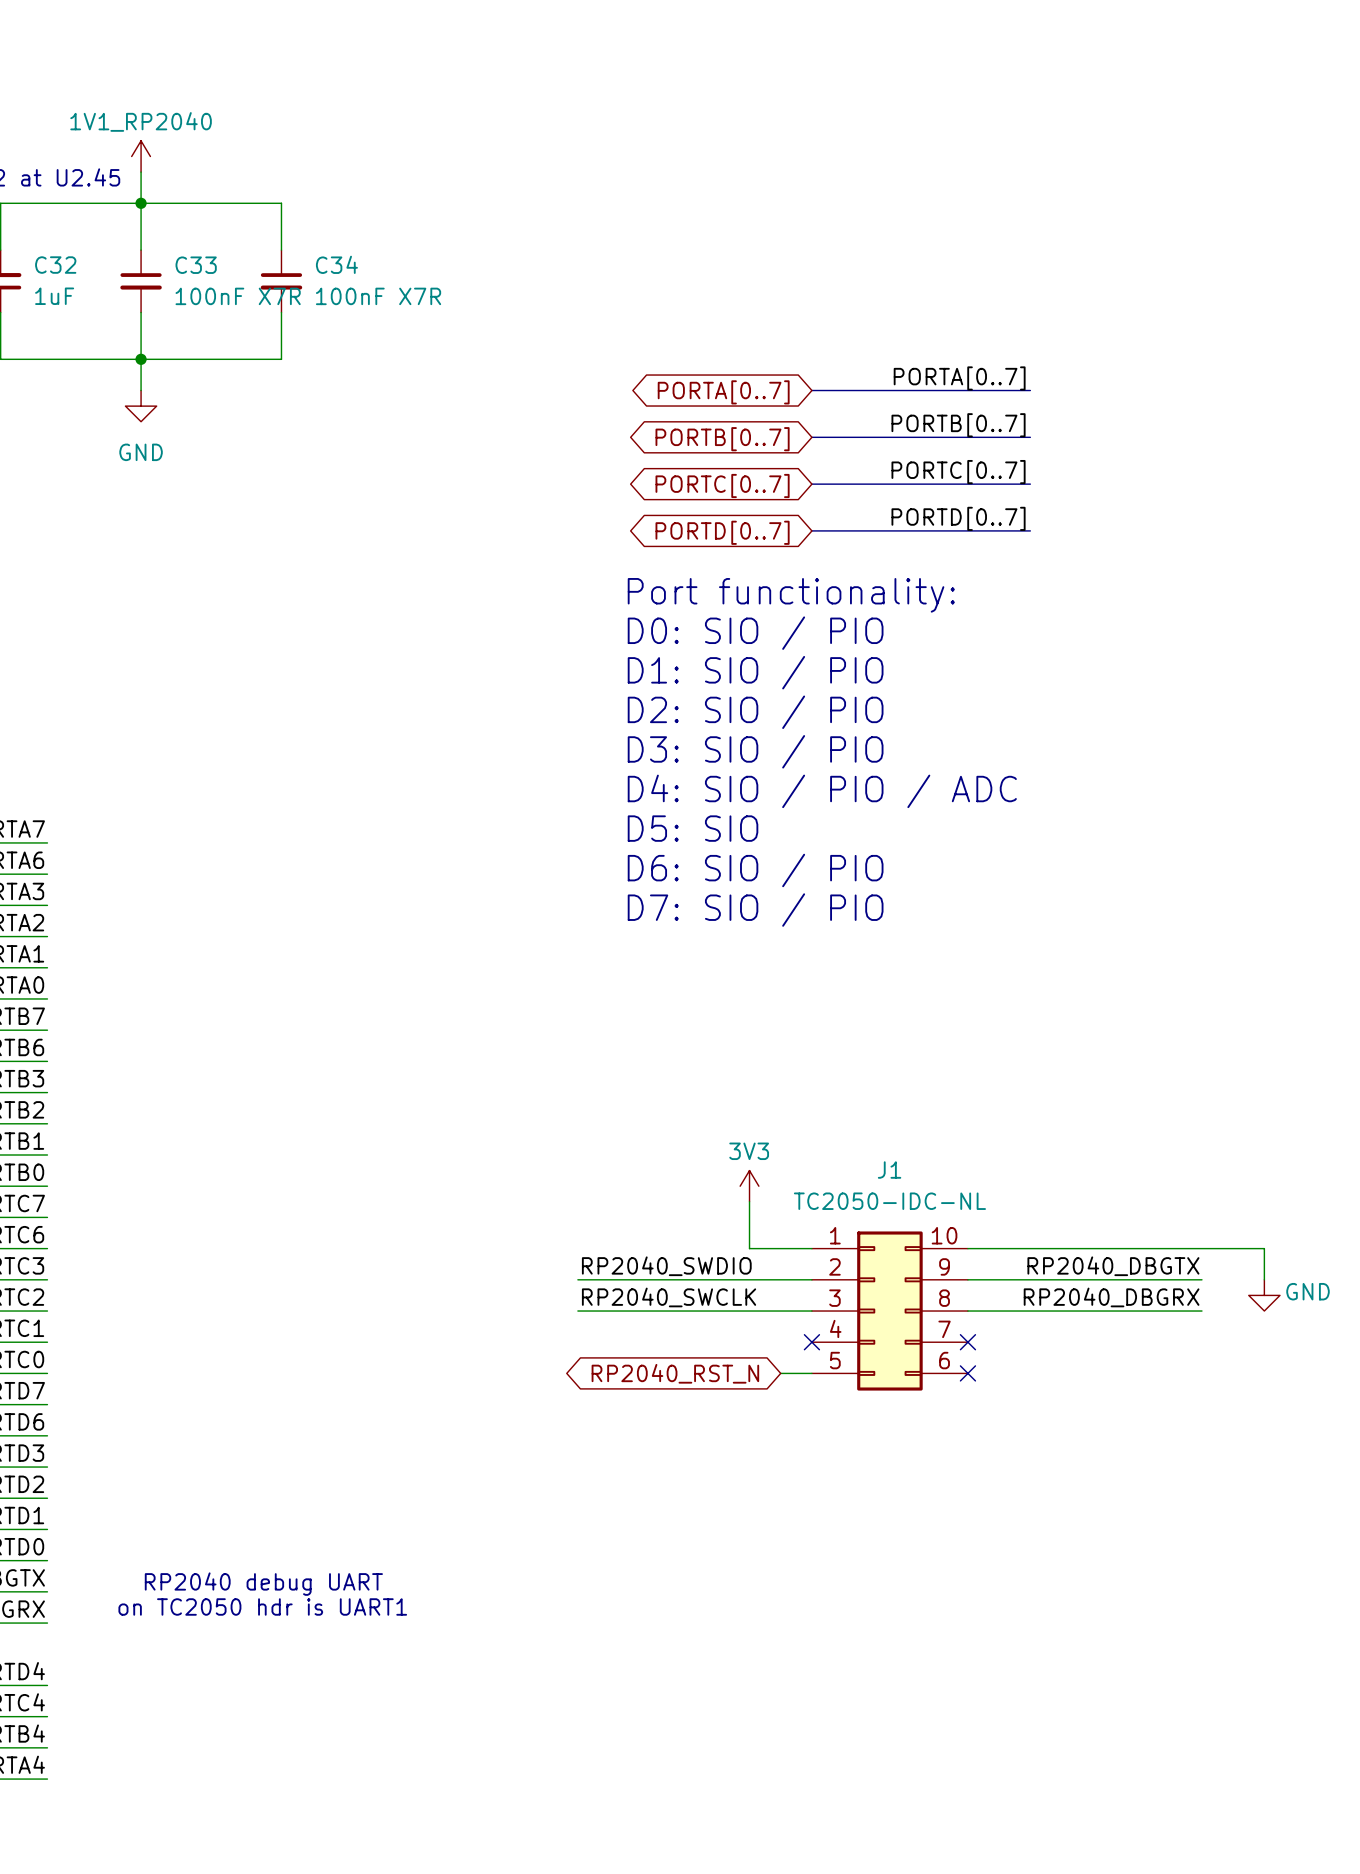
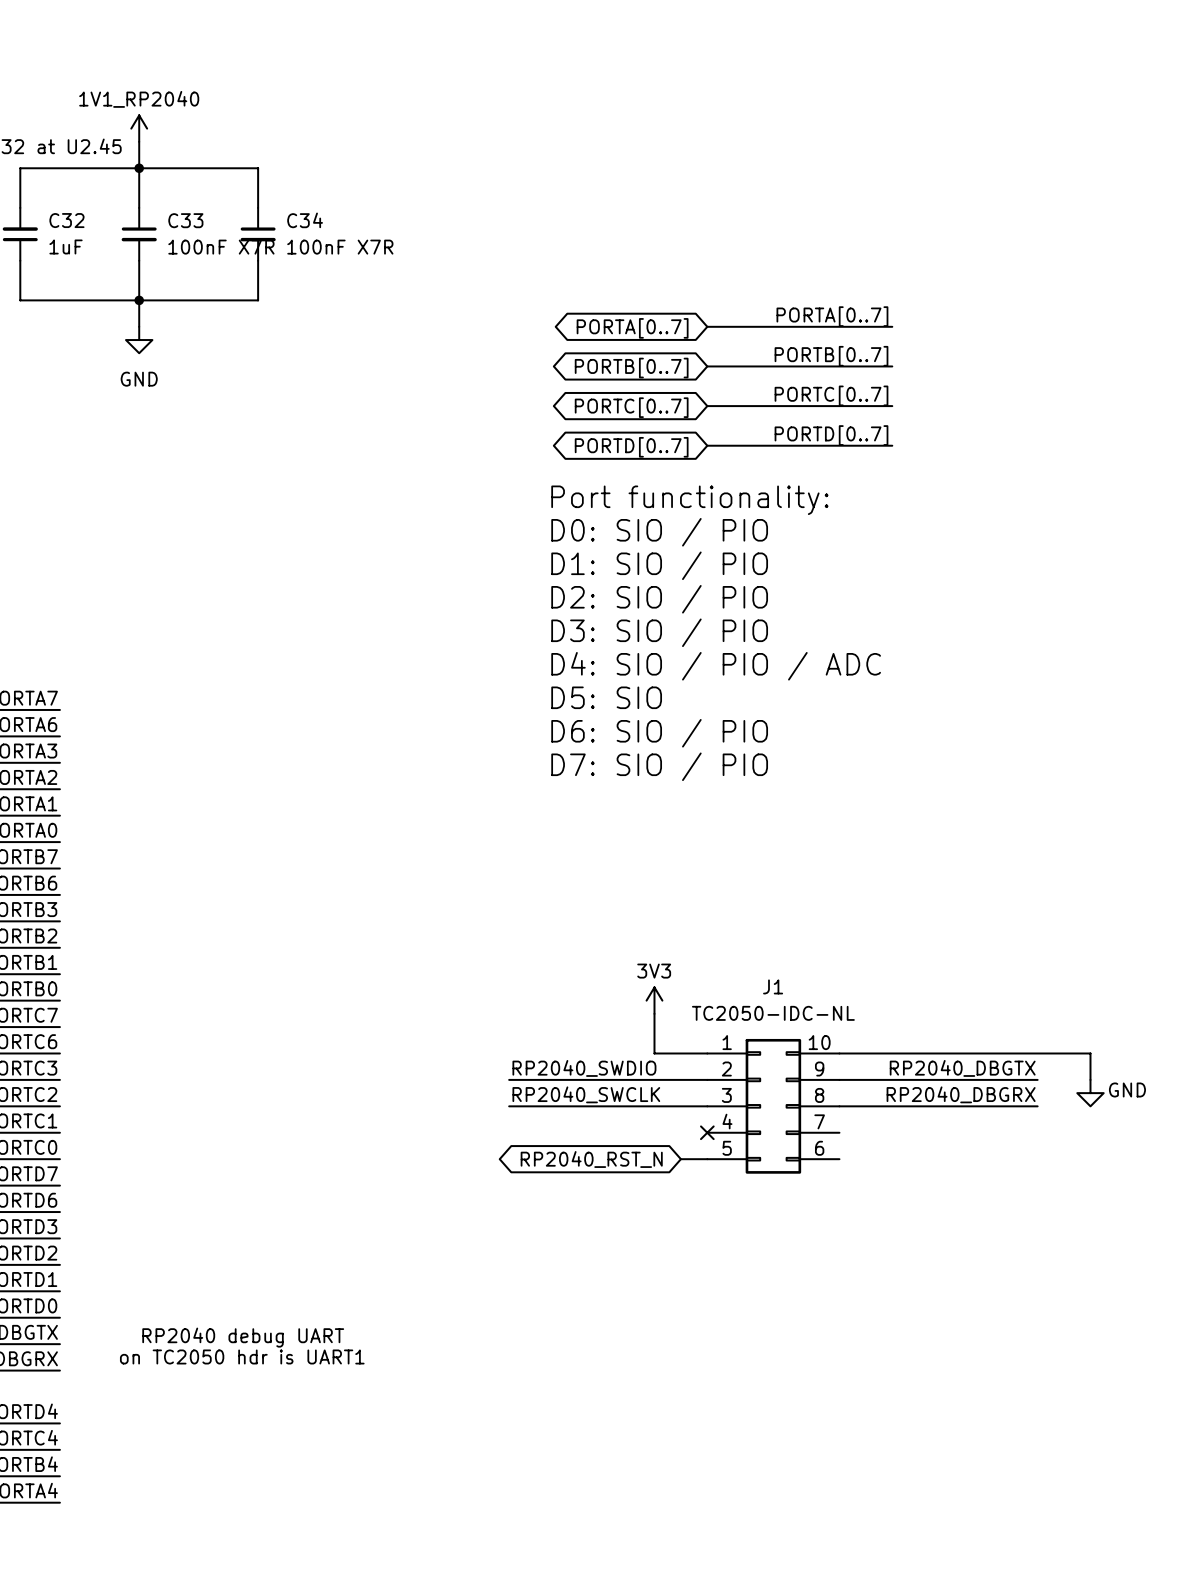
no-connect mark: (967, 1342) -> none
no-connect mark: (967, 1373) -> none

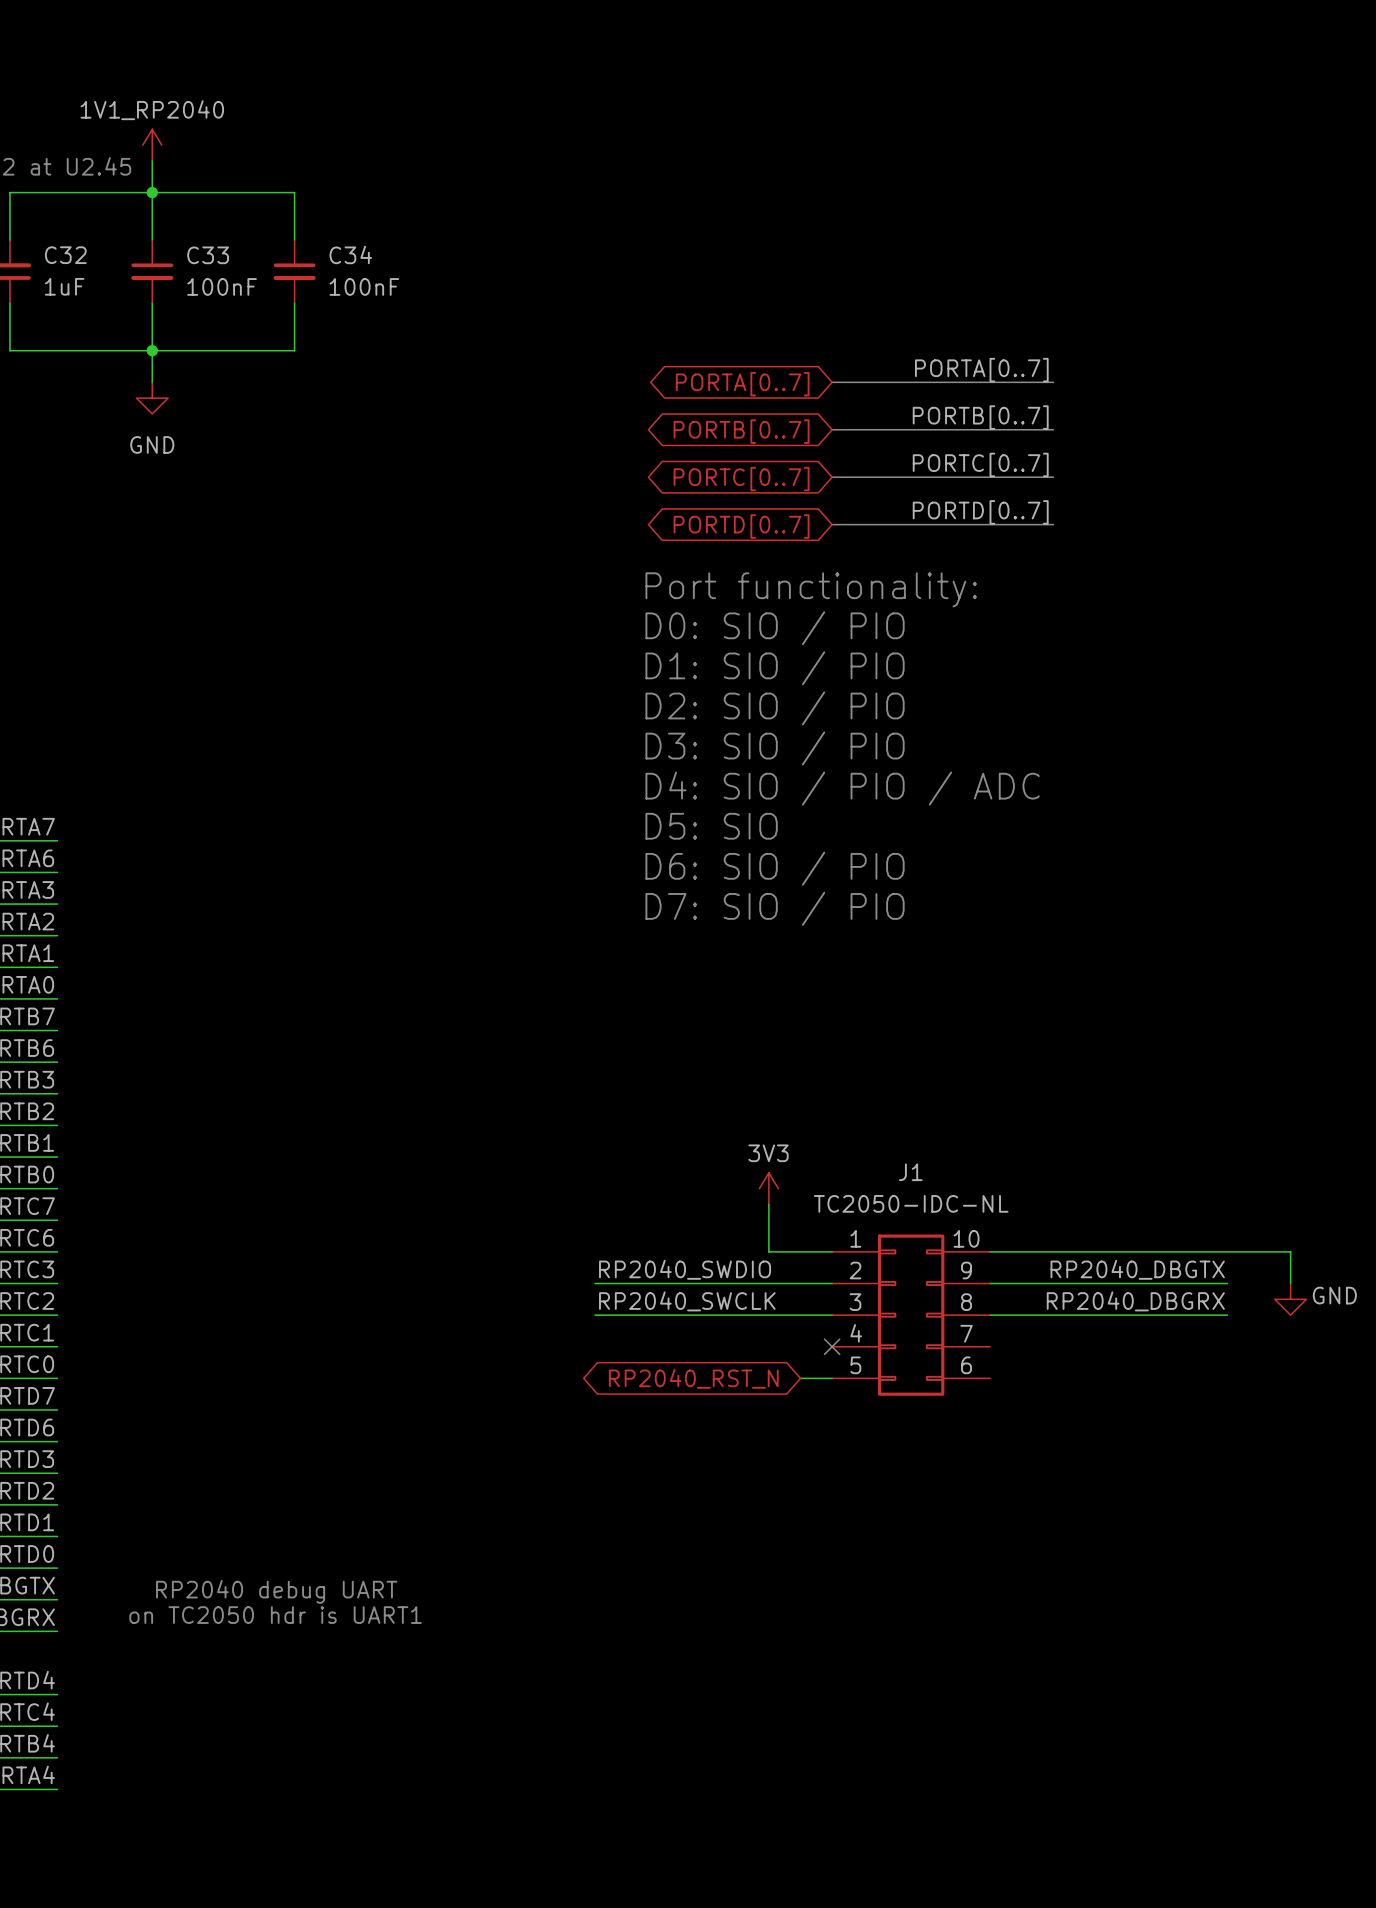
C33 value: 100nF X7R (221, 247) -> 100nF (222, 286)
C34 value: 100nF X7R (340, 247) -> 100nF (364, 286)

